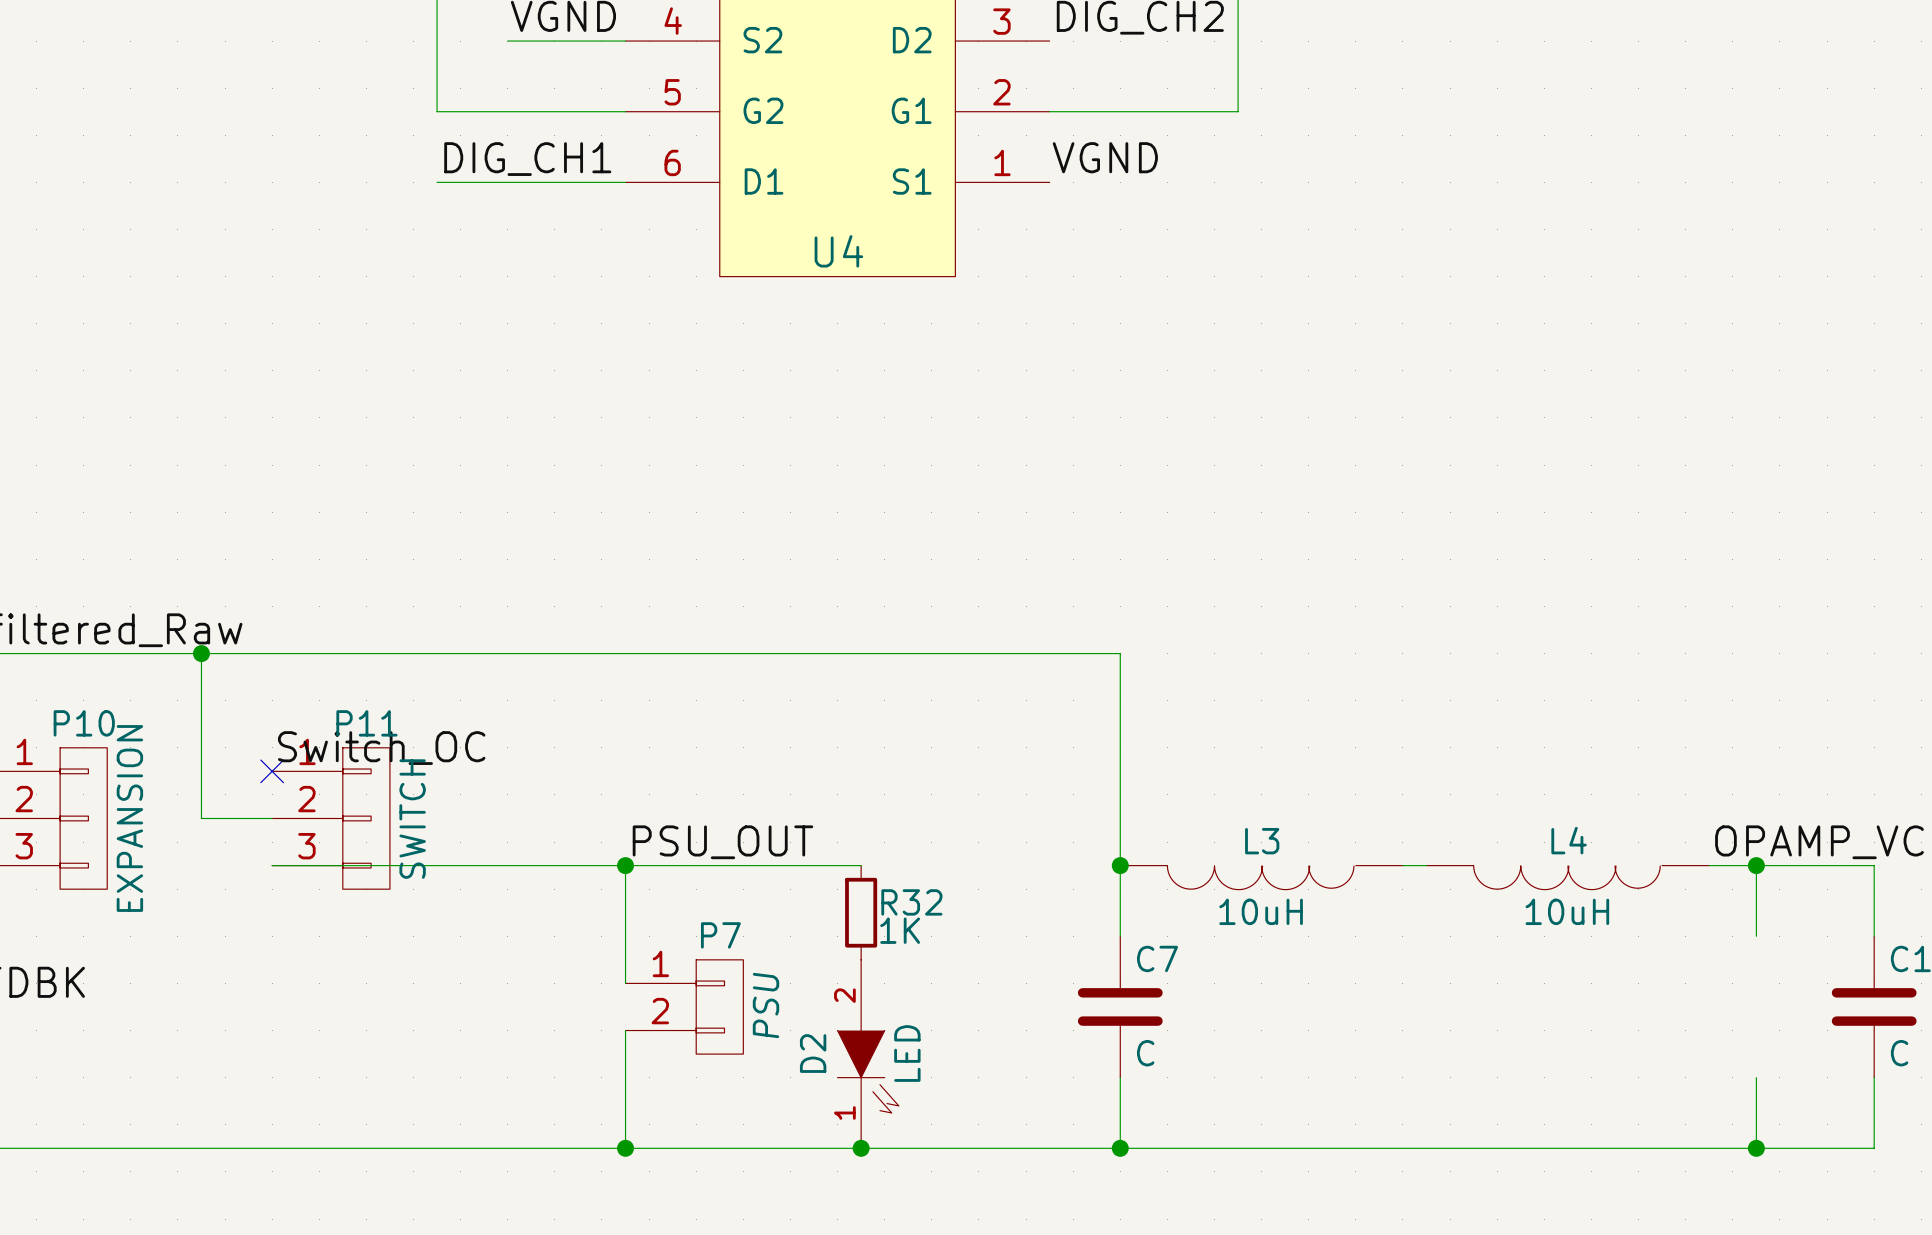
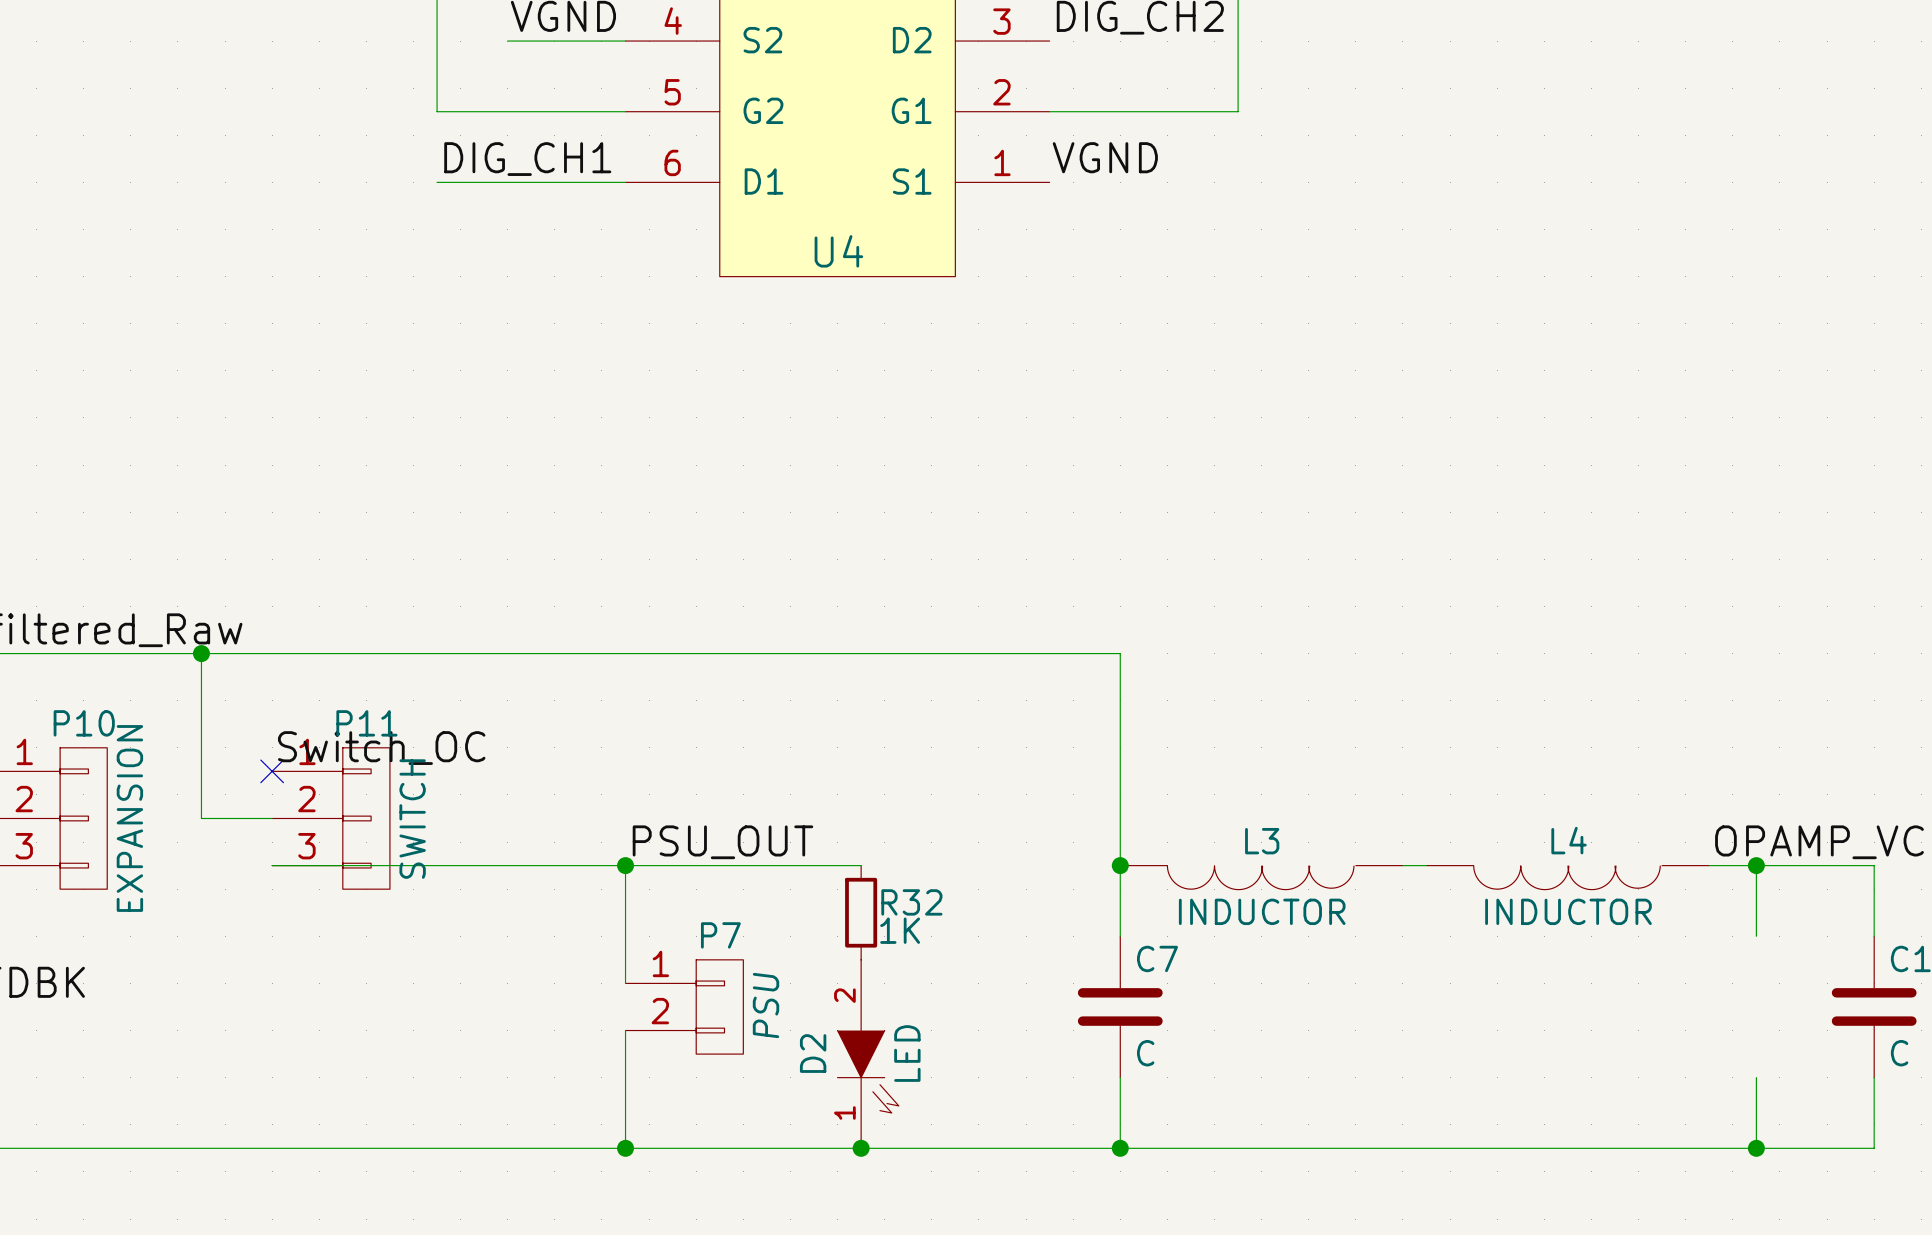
L3 value: 10uH (1261, 911) -> INDUCTOR (1262, 911)
L4 value: 10uH (1567, 911) -> INDUCTOR (1568, 911)

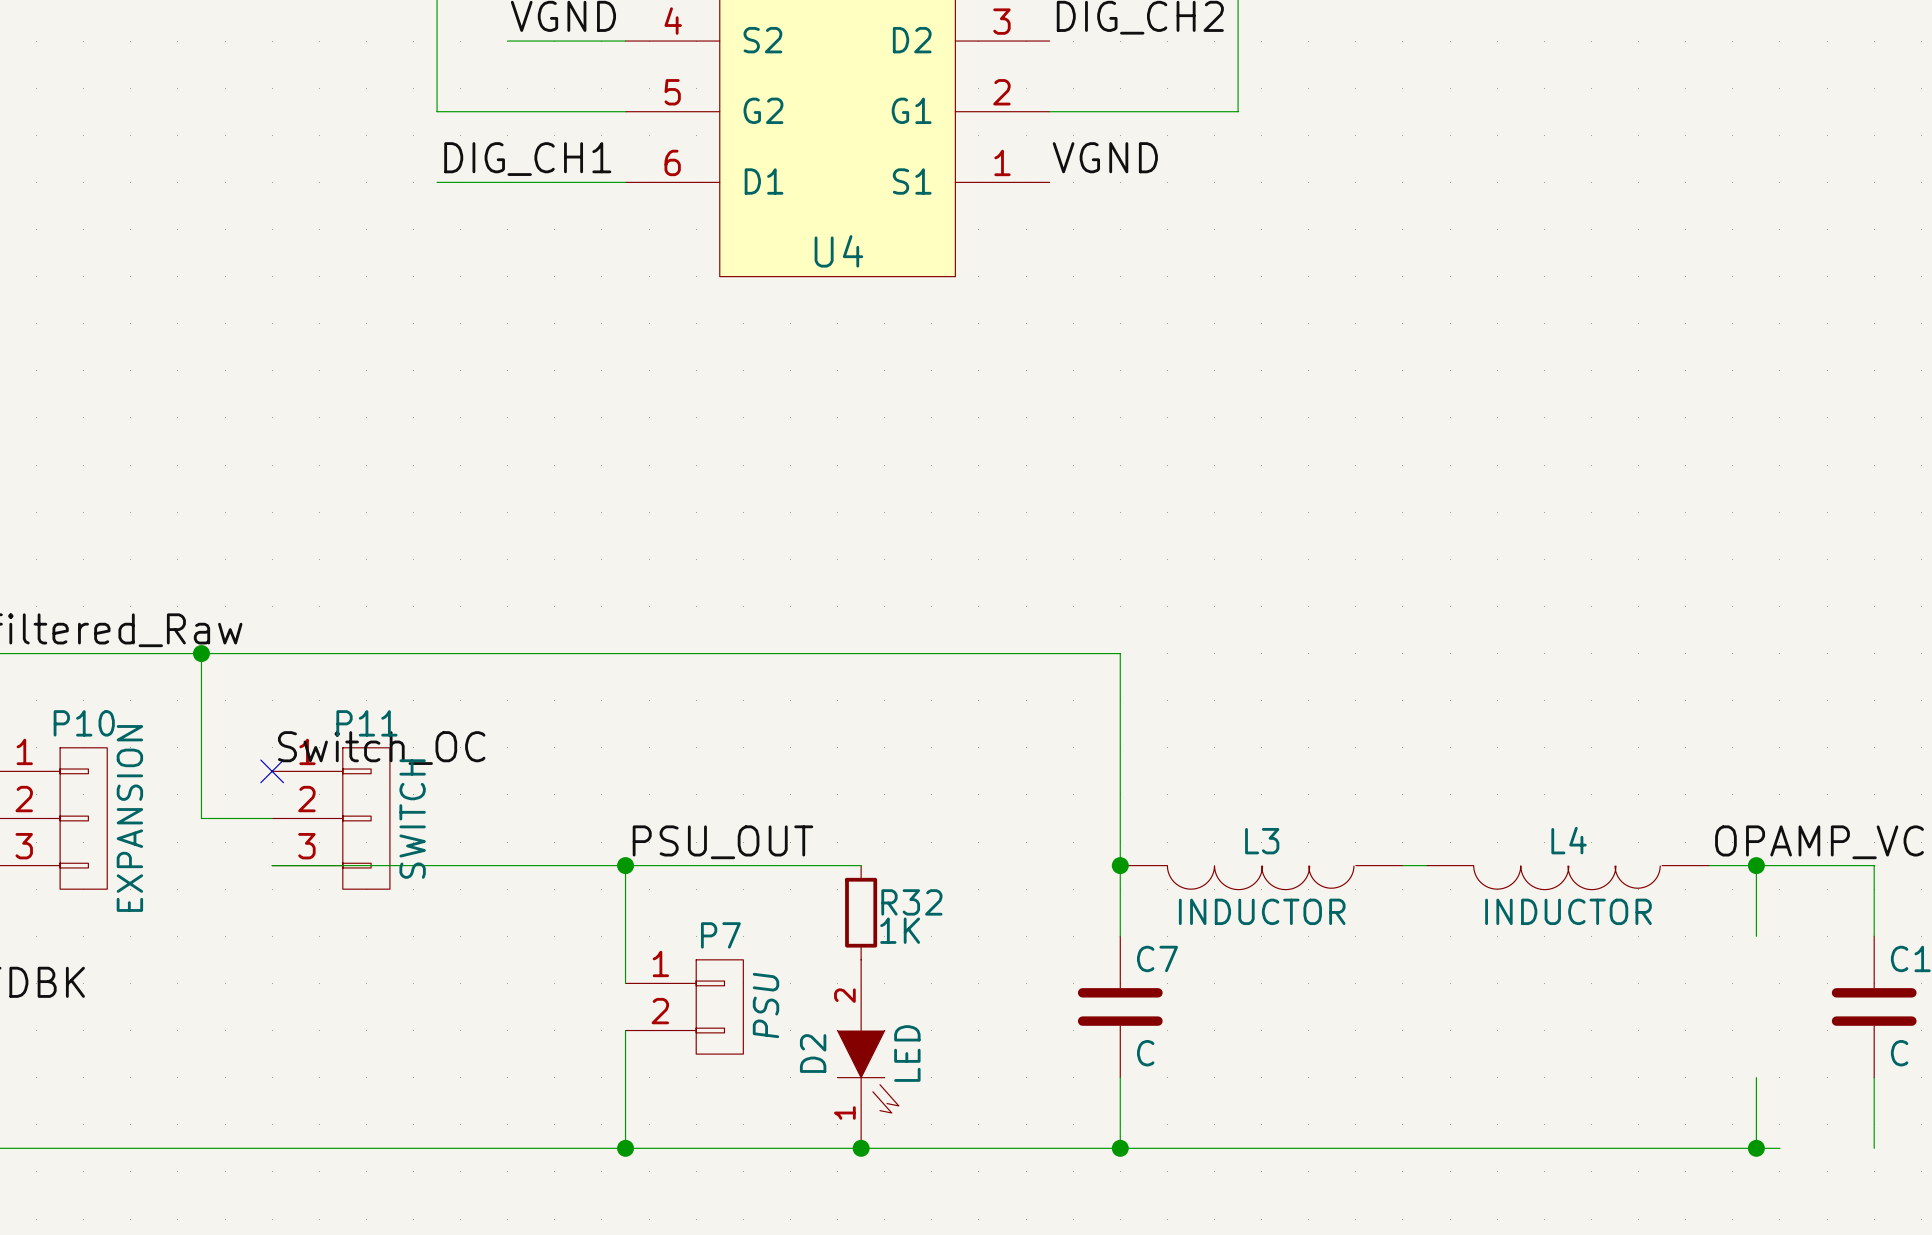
wire: (1779, 1148) (1874, 1148) -> none

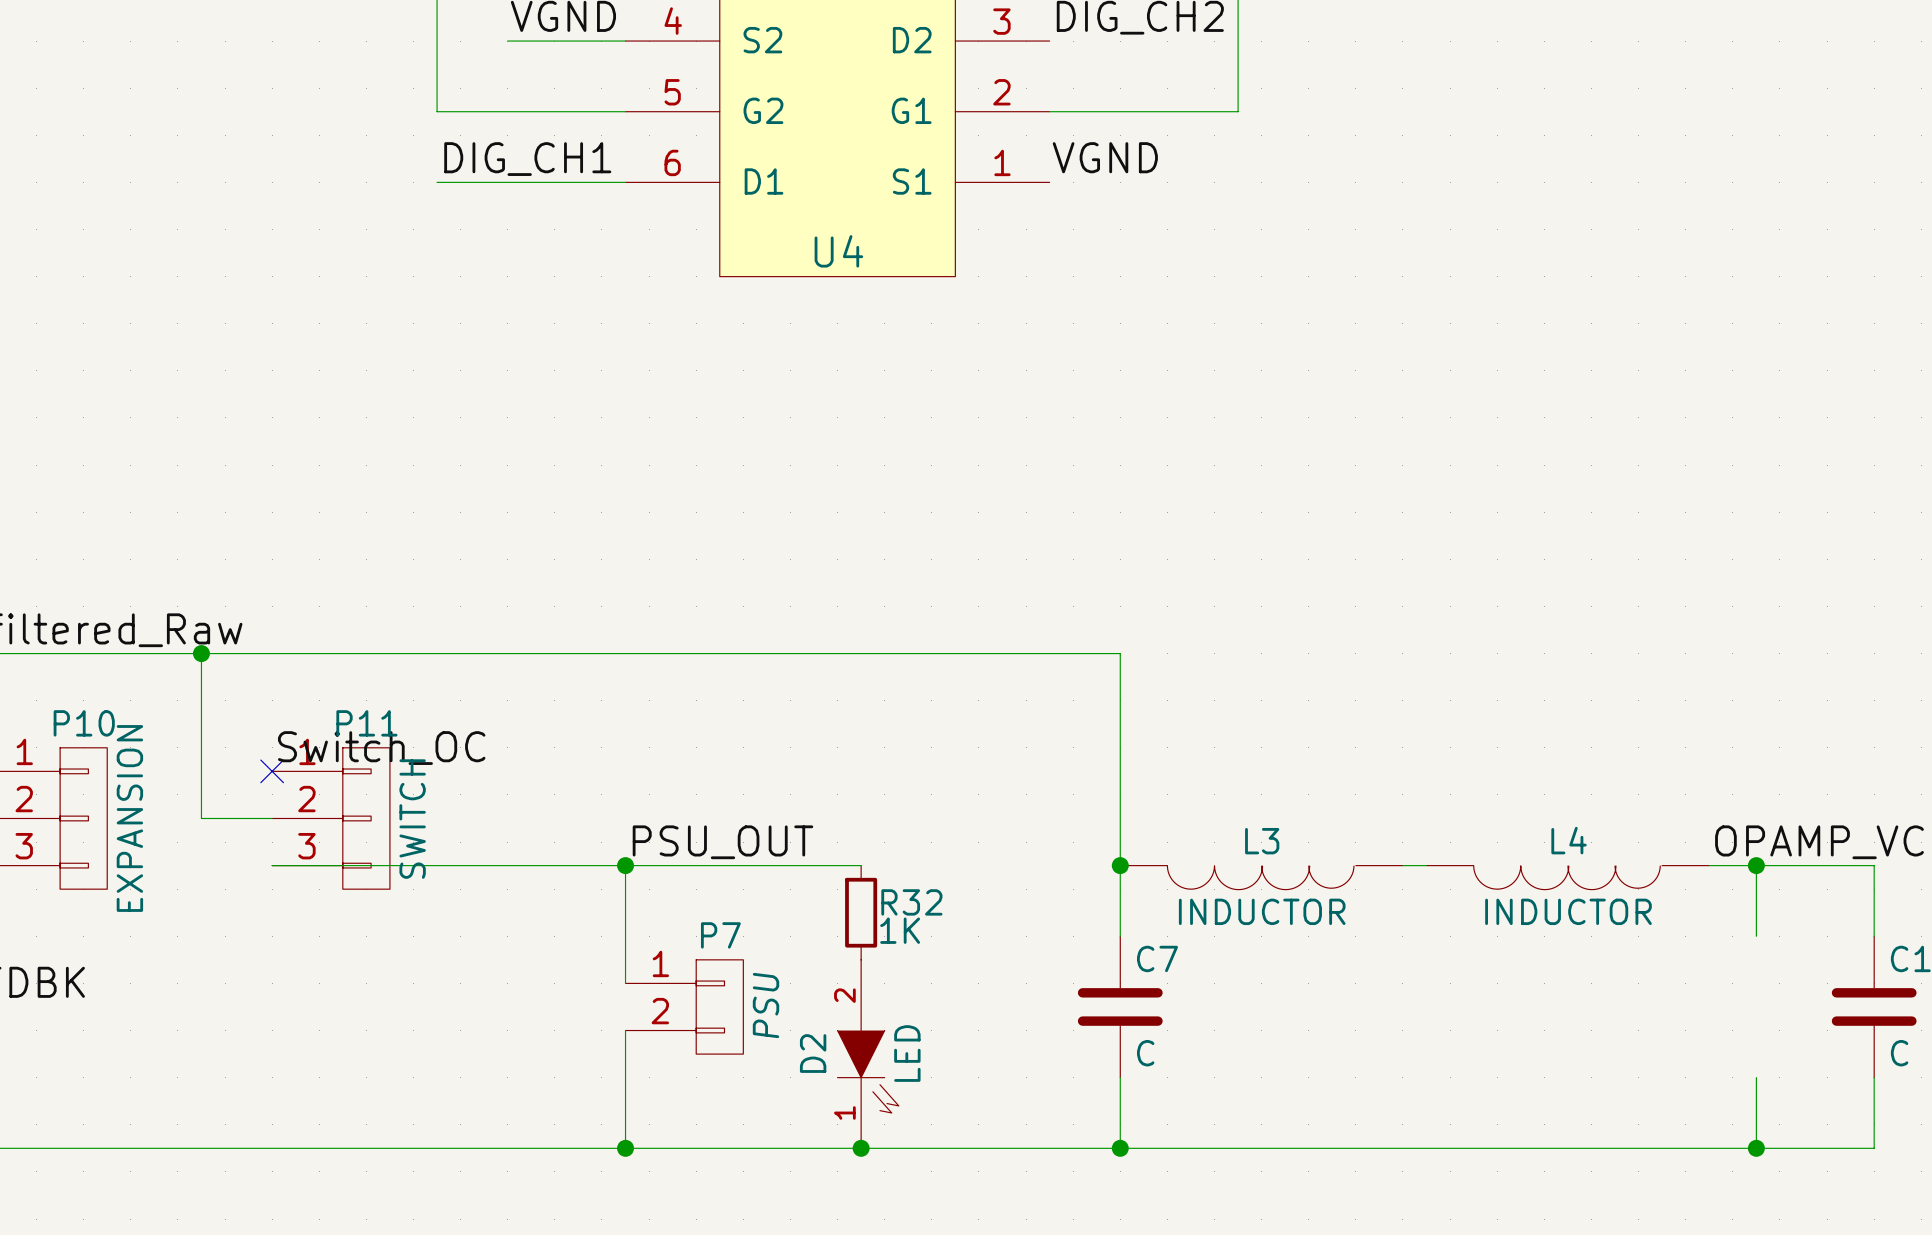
wire: none -> (1779, 1148) (1874, 1148)

